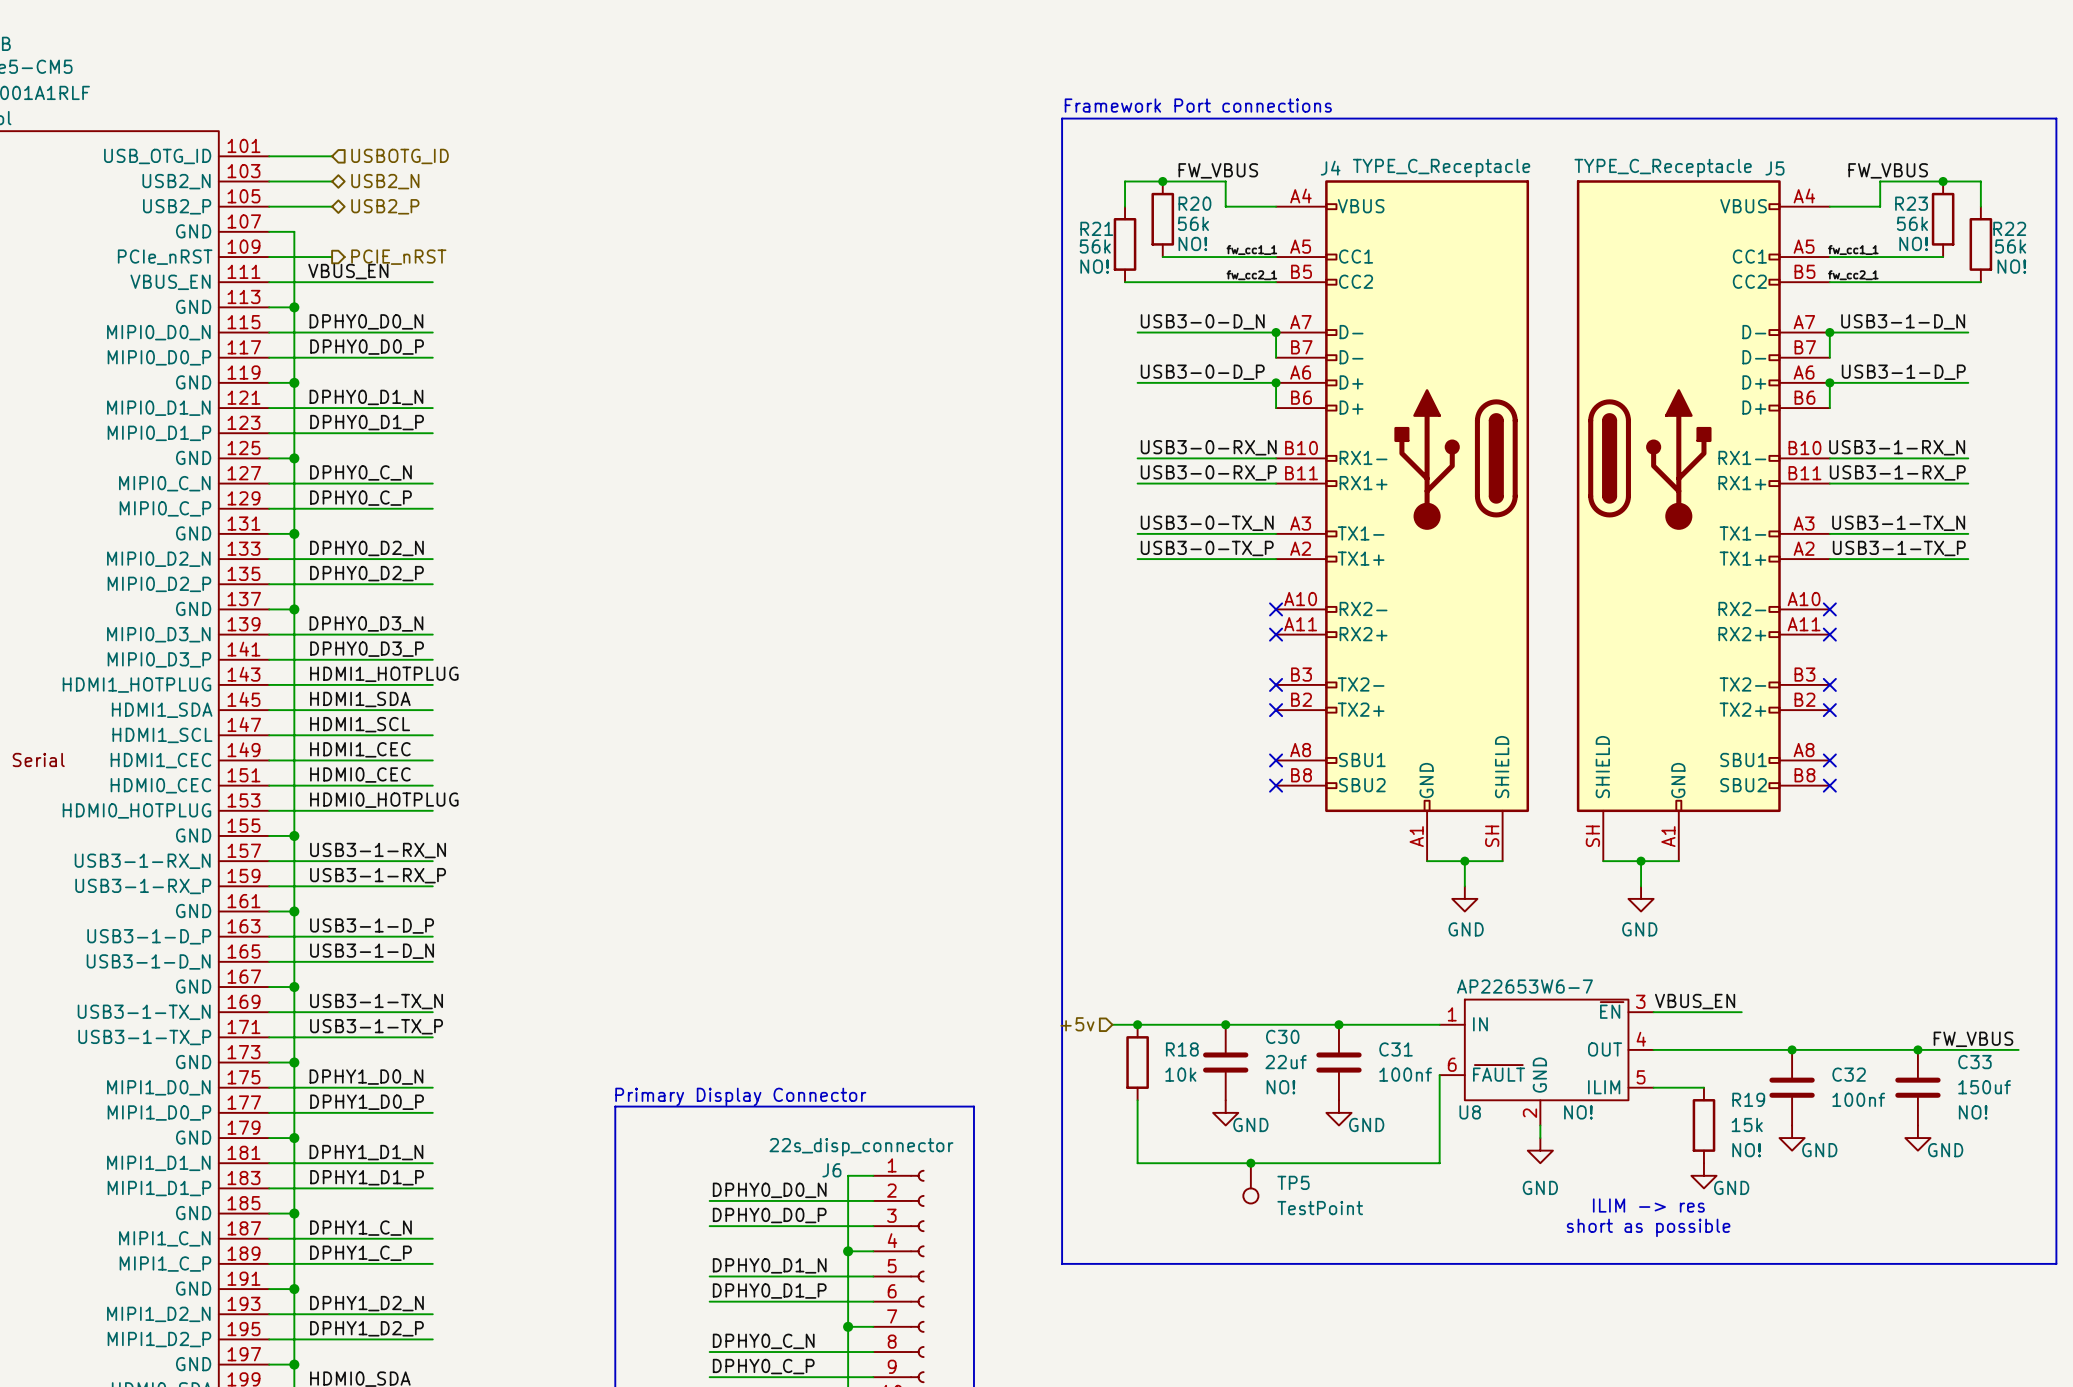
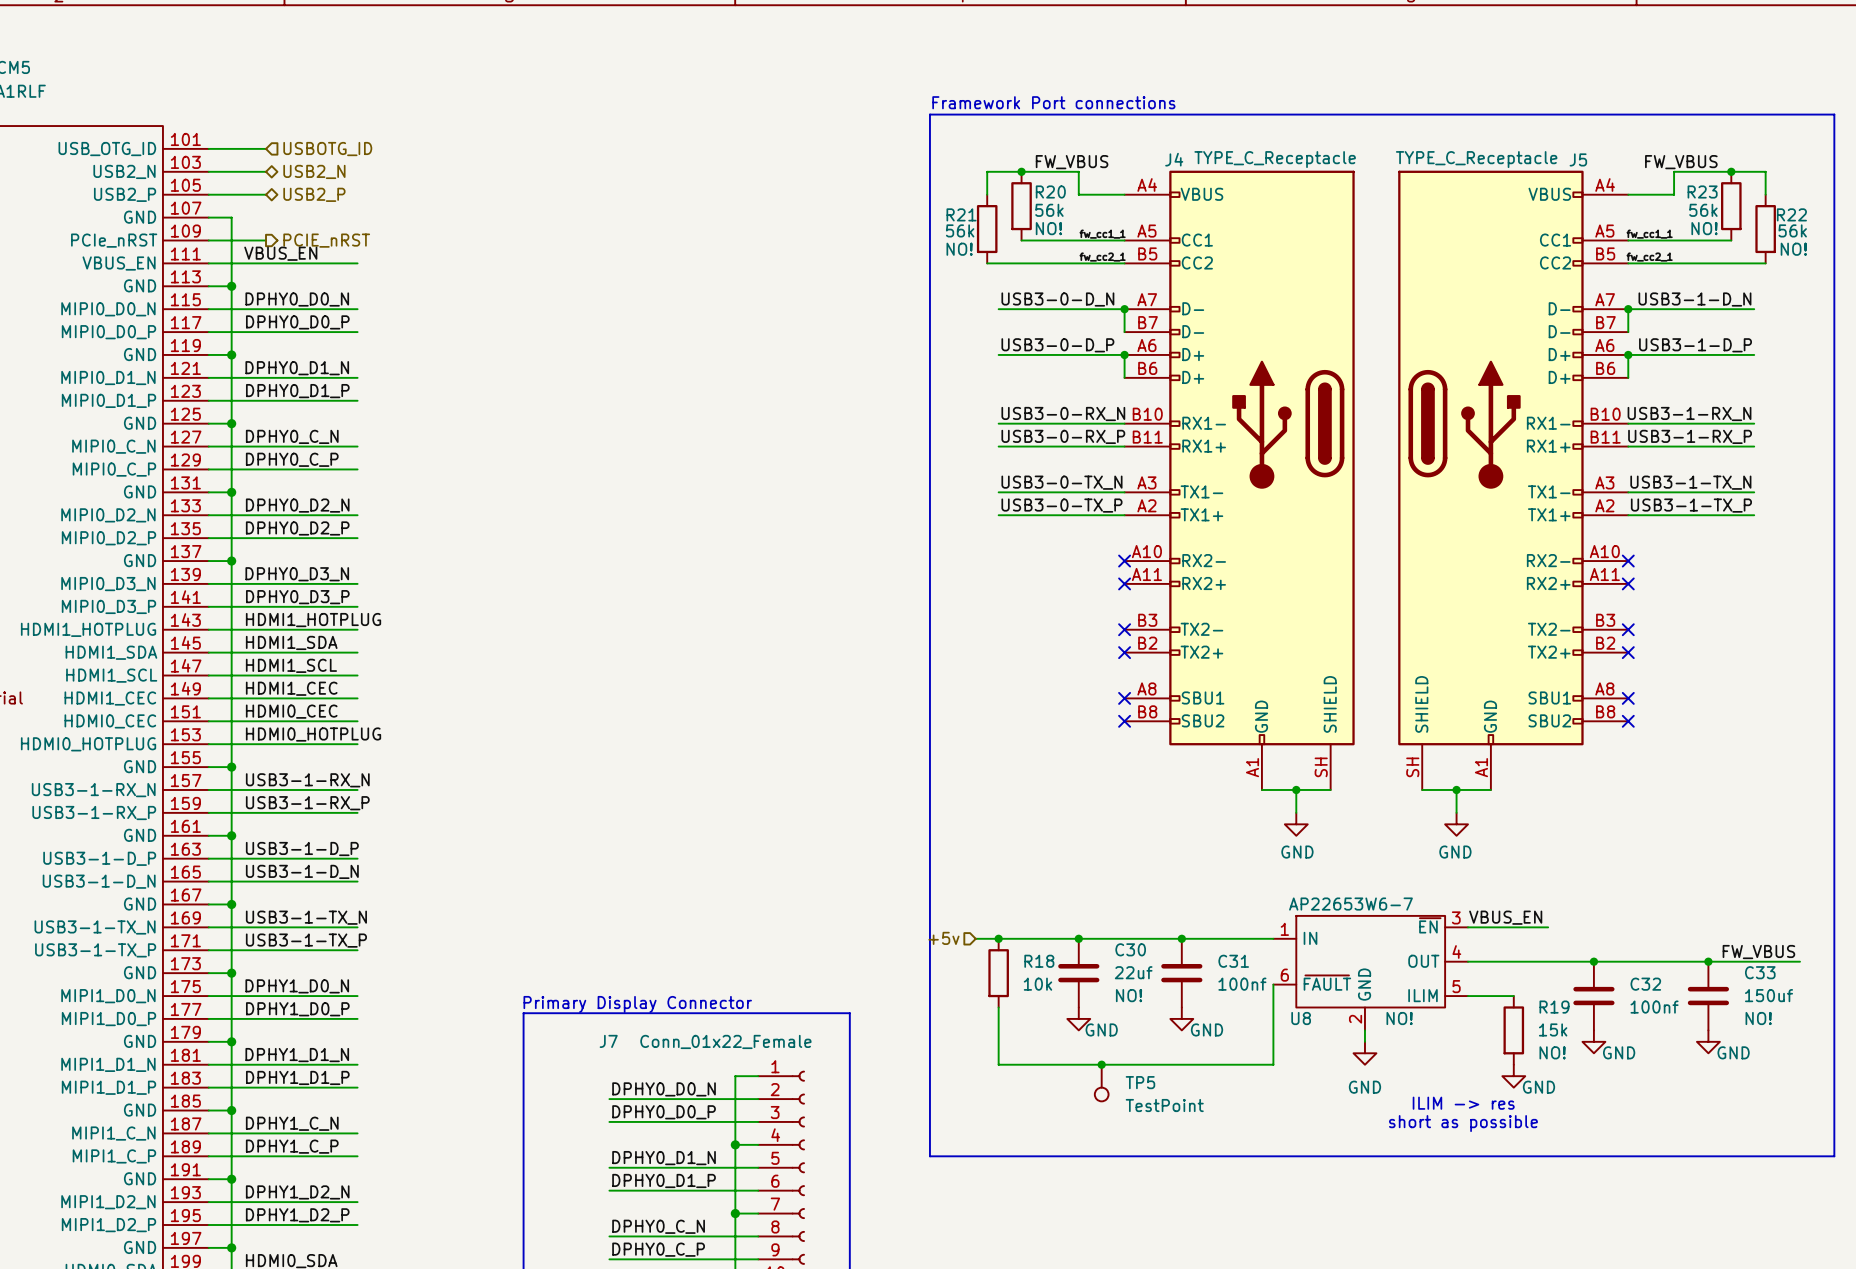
J6 value: 22s_disp_connector (861, 1147) -> Conn_01x22_Female (725, 1041)
J6 name: J6 (831, 1170) -> J7 (608, 1041)

